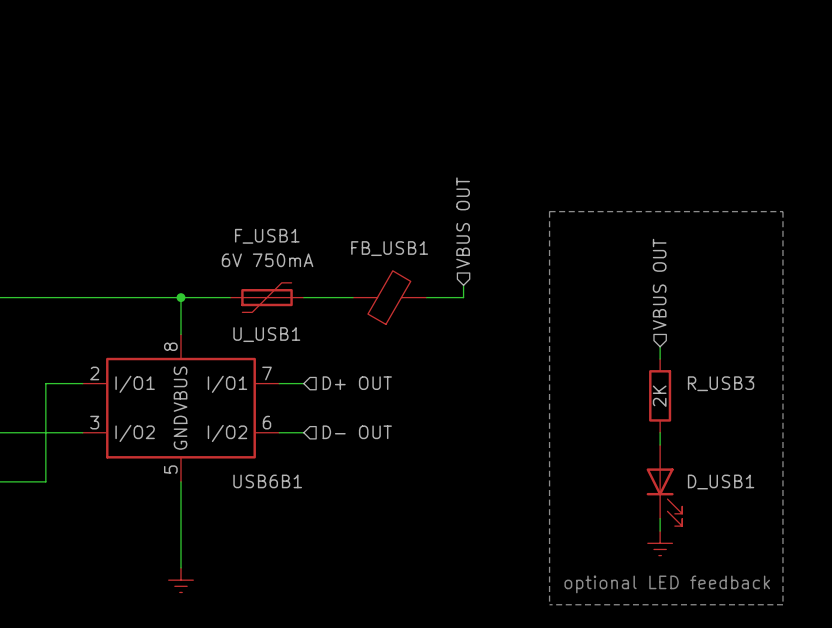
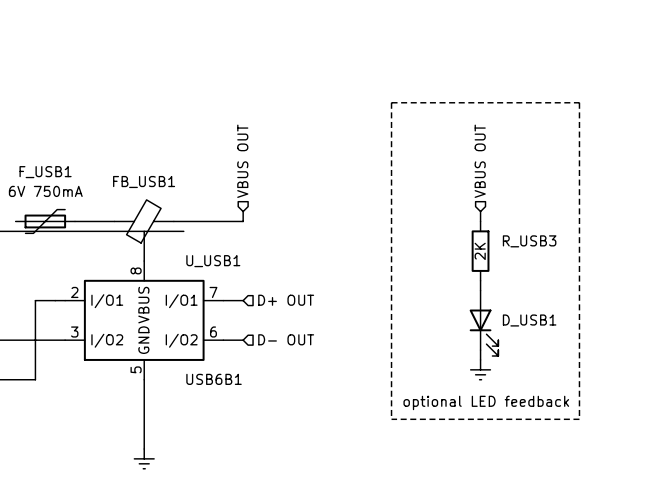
hierarchical label: none -> VBUS OUT (242, 161)
hierarchical label: none -> VBUS OUT (480, 161)
line: (549, 211) (782, 211) (782, 604) (549, 604) (549, 211) -> (391, 102) (579, 102) (579, 419) (391, 419) (391, 102)
hierarchical label: VBUS OUT (463, 222) -> none
wire: none -> (243, 211) (243, 221) (173, 221)
hierarchical label: VBUS OUT (659, 284) -> none
wire: (463, 285) (463, 297) (426, 297) -> none
junction: (180, 297) -> none
F_USB1 position: (266, 297) -> (45, 221)
wire: (303, 297) (352, 297) -> (74, 221) (114, 221)
FB_USB1 position: (389, 297) -> (144, 221)
wire: (660, 346) (660, 359) -> (480, 211) (480, 221)
R_USB3 position: (660, 395) -> (480, 251)
wire: (660, 432) (660, 445) -> (480, 280) (480, 290)
D_USB1 position: (664, 485) -> (484, 323)
wire: (660, 518) (660, 531) -> (480, 350) (480, 359)
power symbol position: (660, 543) -> (480, 369)
text position: optional LED feedback (667, 584) -> optional LED feedback (486, 402)

